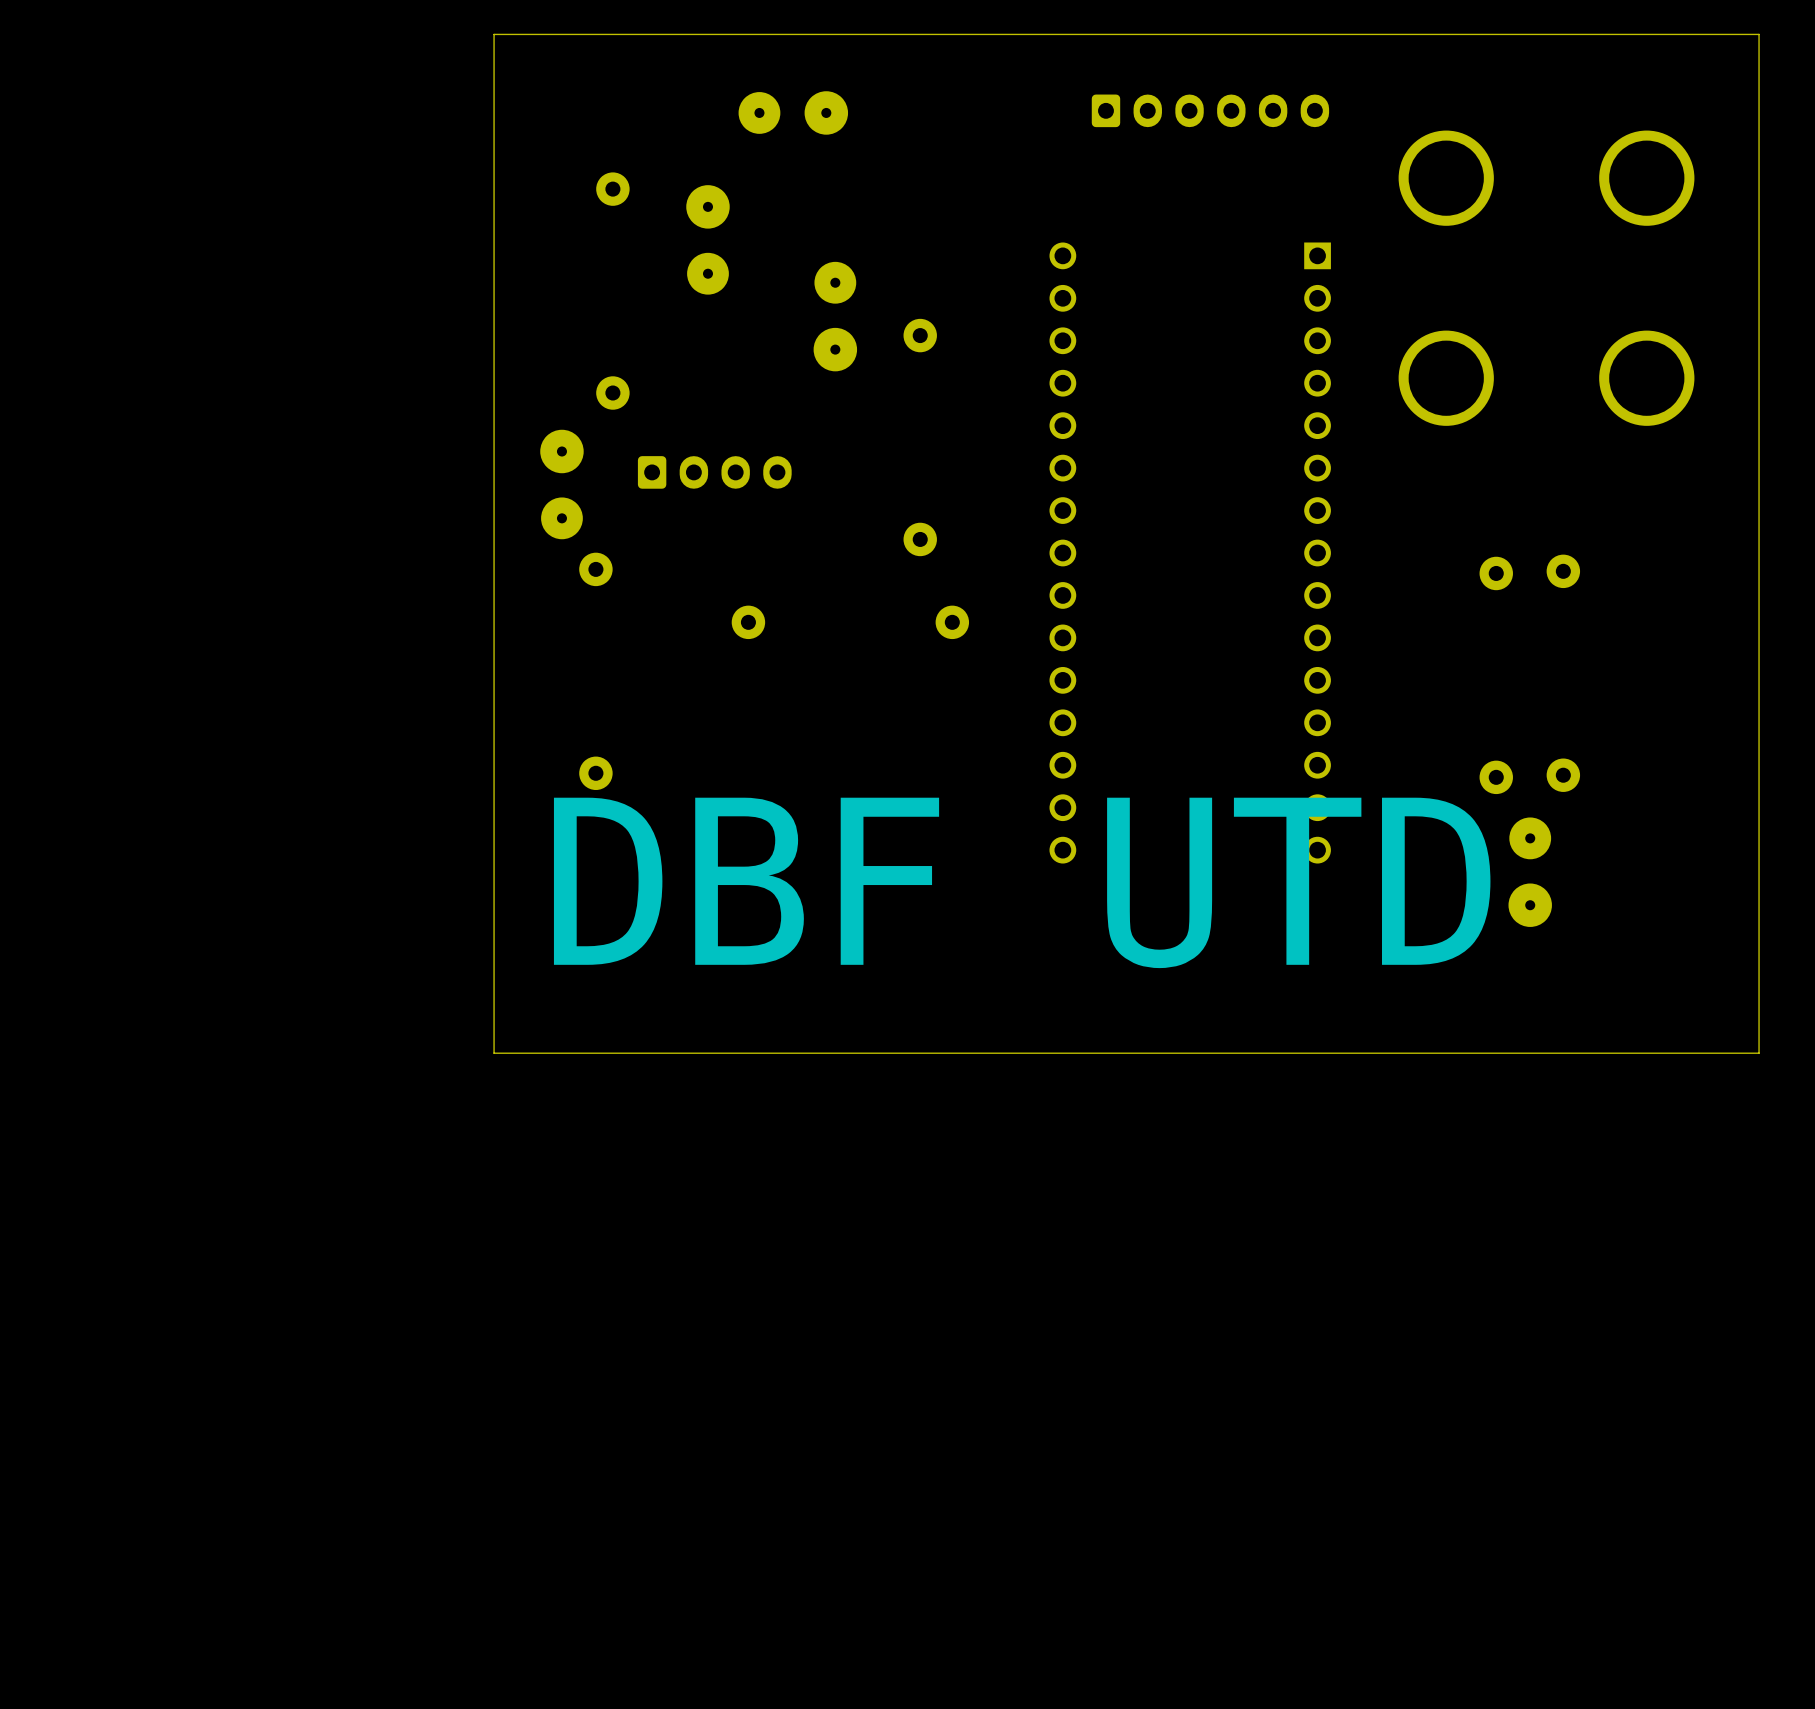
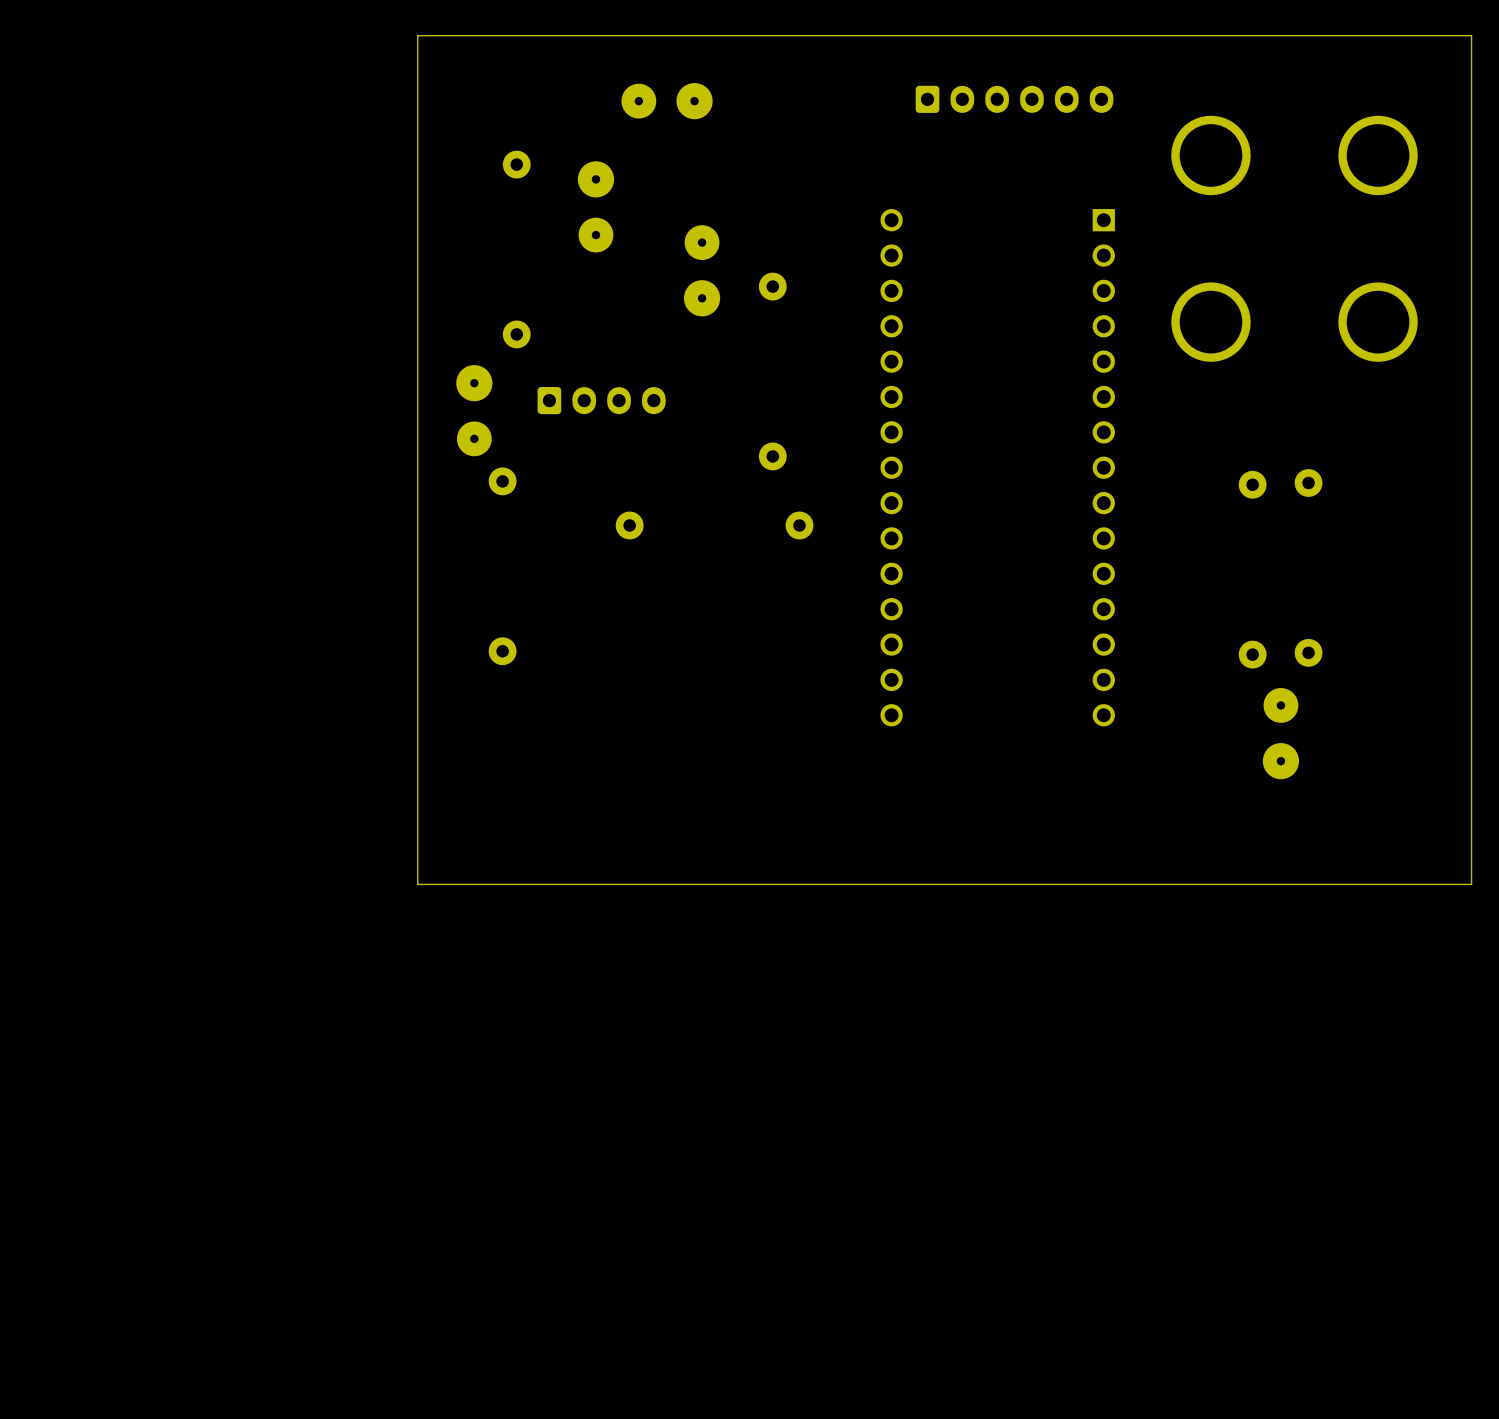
text: DBF UTD (1022, 882) -> none

